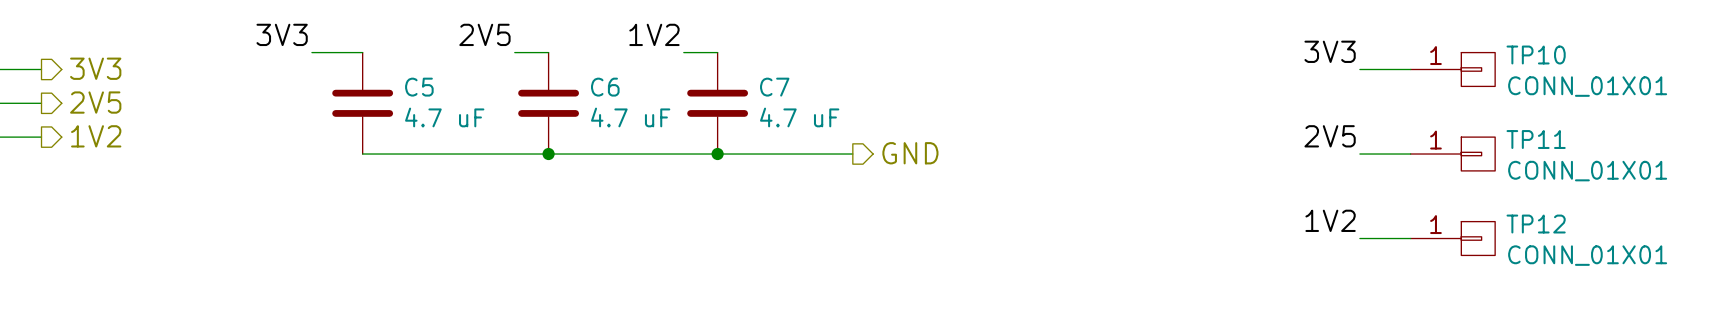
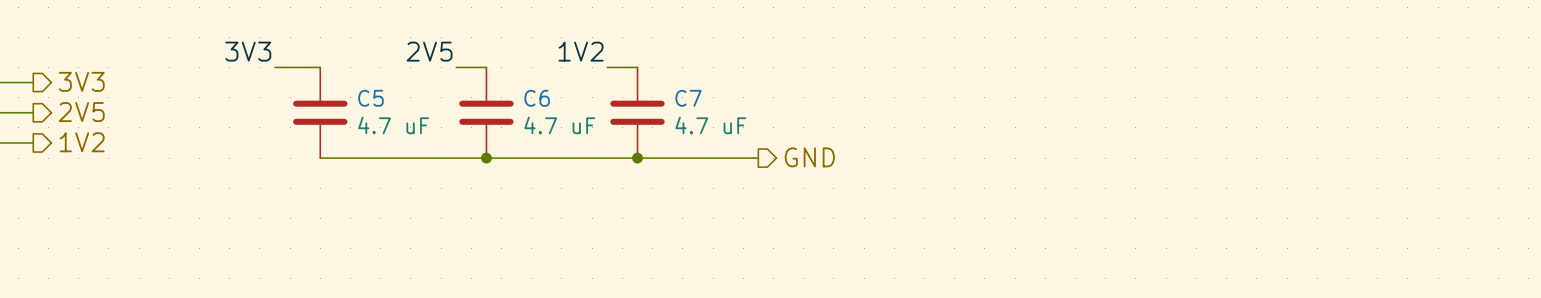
label: 3V3 (1330, 51) -> none
wire: (1359, 69) (1410, 69) -> none
TP10: CONN_01X01 (1452, 69) -> none
label: 2V5 (1330, 136) -> none
wire: (1359, 154) (1410, 154) -> none
TP11: CONN_01X01 (1452, 154) -> none
label: 1V2 (1330, 220) -> none
wire: (1359, 238) (1410, 238) -> none
TP12: CONN_01X01 (1452, 238) -> none

